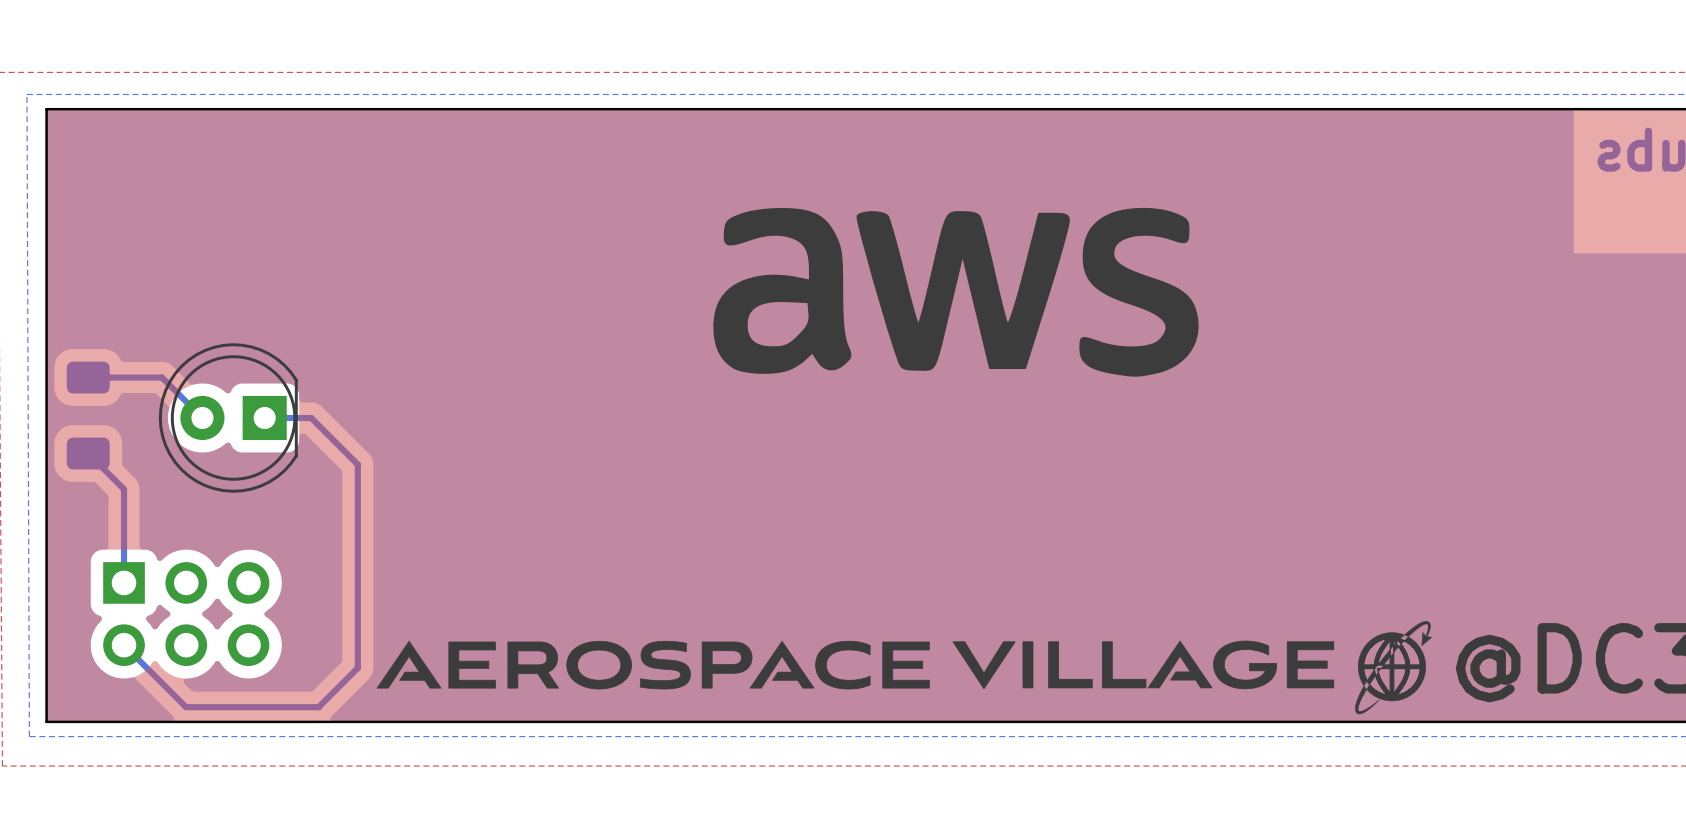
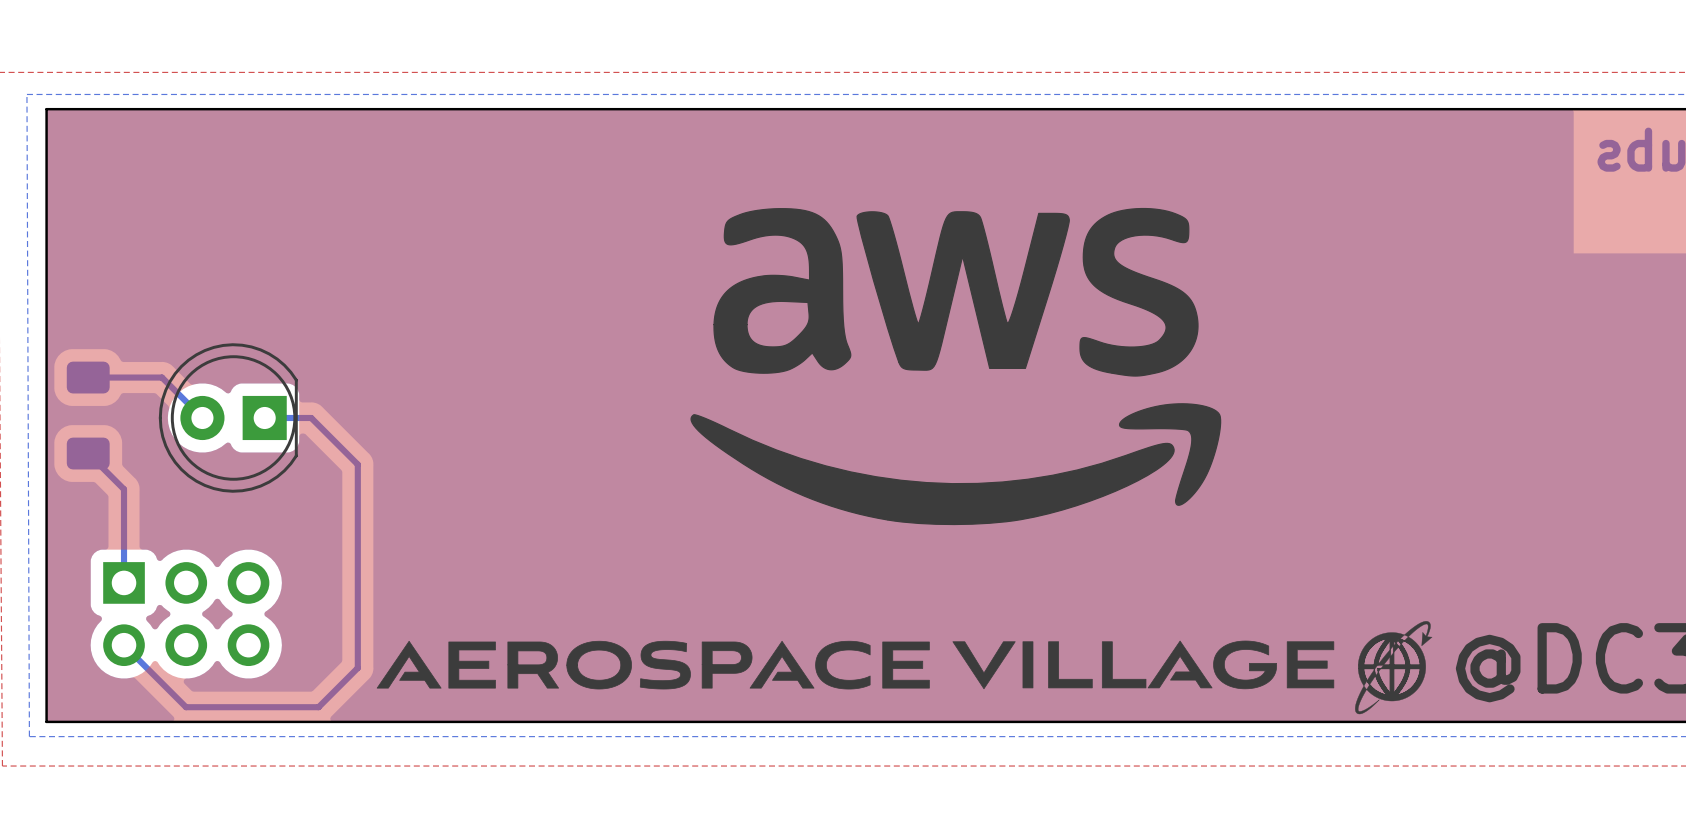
drawing: none -> [690, 403, 1222, 526]

